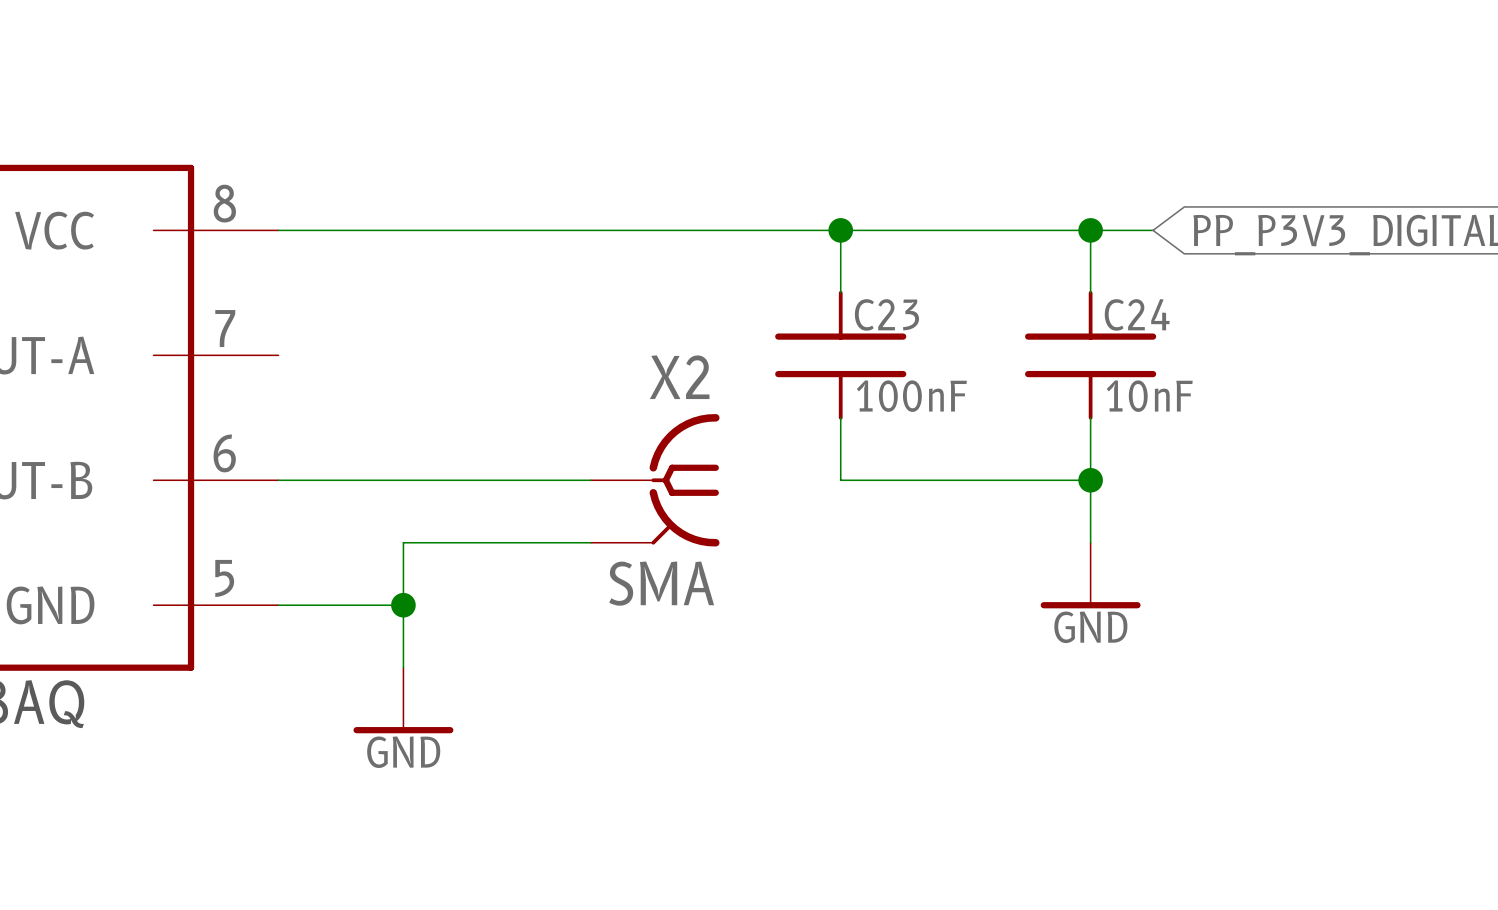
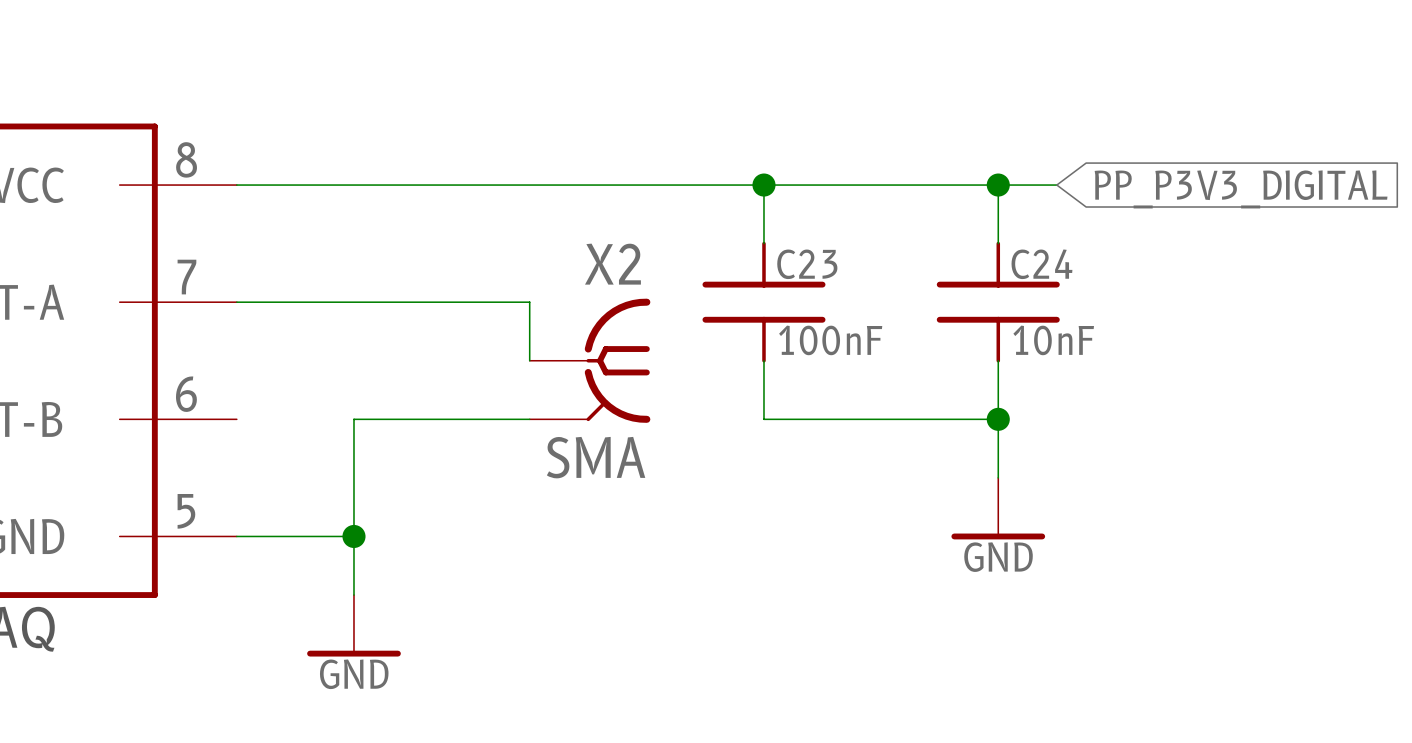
wire: none -> (236, 302) (529, 302) (529, 360)
wire: (278, 480) (403, 480) -> (353, 477) (353, 419)
X2 position: (655, 480) -> (590, 360)
wire: (403, 542) (590, 542) -> none

